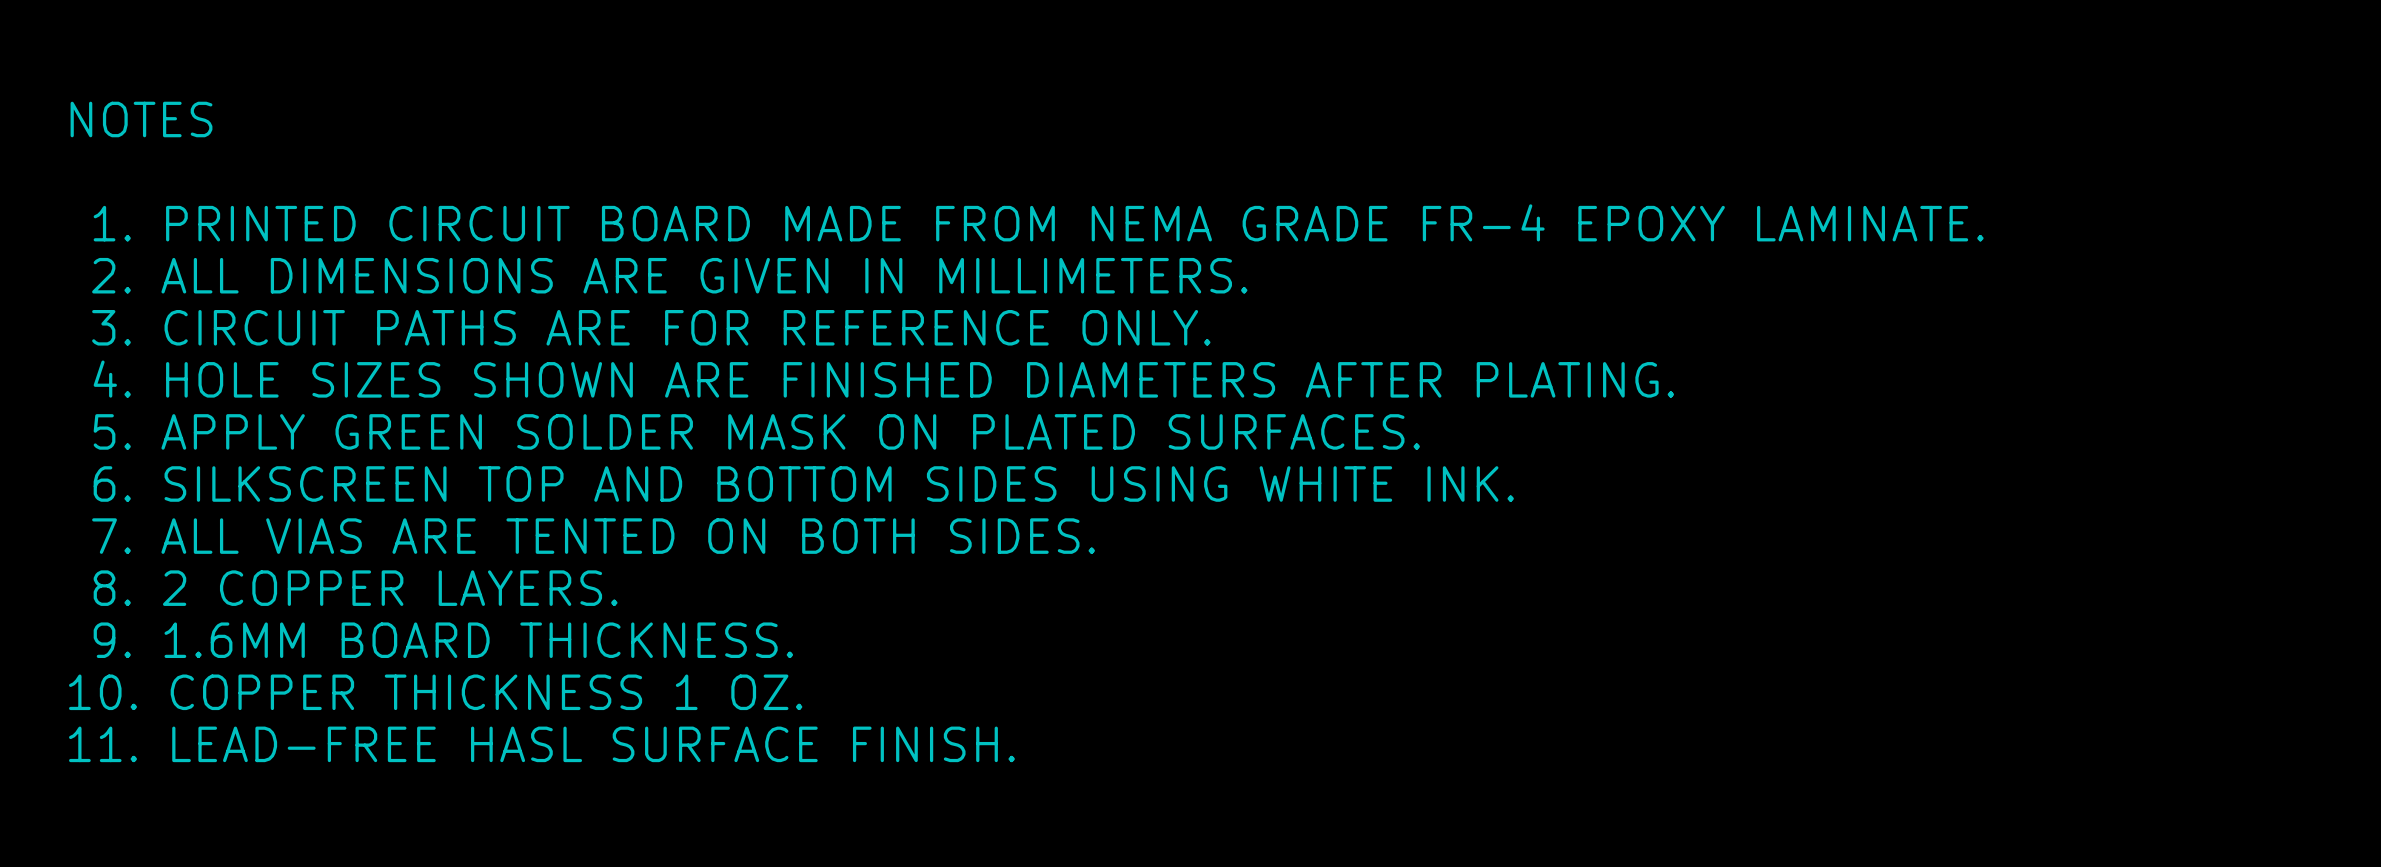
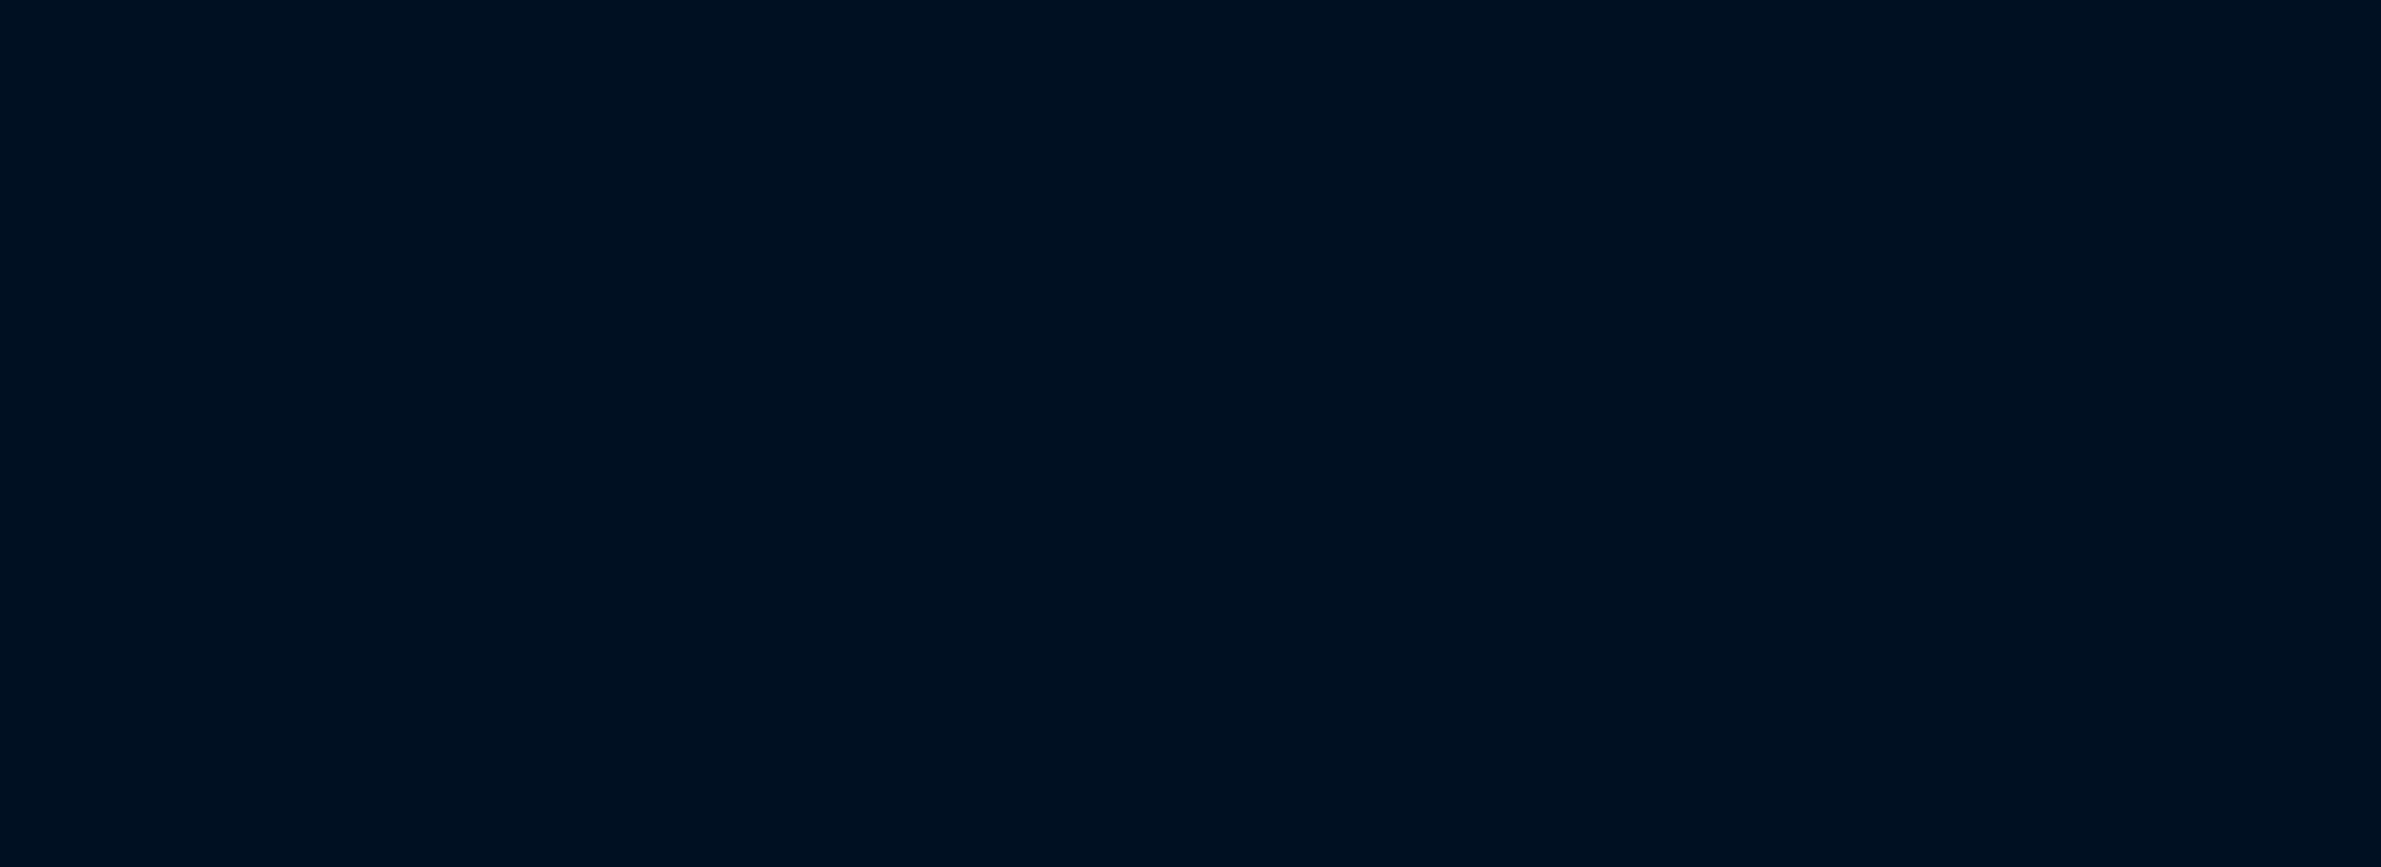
text: NOTES (141, 119) -> none
text: 1. PRINTED CIRCUIT BOARD MADE FROM NEMA GRADE FR-4 EPOXY LAMINATE. (1038, 222) -> none
text: 2. ALL DIMENSIONS ARE GIVEN IN MILLIMETERS. (669, 275) -> none
text: 3. CIRCUIT PATHS ARE FOR REFERENCE ONLY. (651, 327) -> none
text: 4. HOLE SIZES SHOWN ARE FINISHED DIAMETERS AFTER PLATING. (883, 379) -> none
text: 5. APPLY GREEN SOLDER MASK ON PLATED SURFACES. (756, 431) -> none
text: 6. SILKSCREEN TOP AND BOTTOM SIDES USING WHITE INK. (803, 484) -> none
text: 7. ALL VIAS ARE TENTED ON BOTH SIDES. (593, 536) -> none
text: 8. 2 COPPER LAYERS. (355, 588) -> none
text: 9. 1.6MM BOARD THICKNESS. (443, 640) -> none
text: 10. COPPER THICKNESS 1 OZ. (435, 692) -> none
text: 11. LEAD-FREE HASL SURFACE FINISH. (541, 744) -> none

